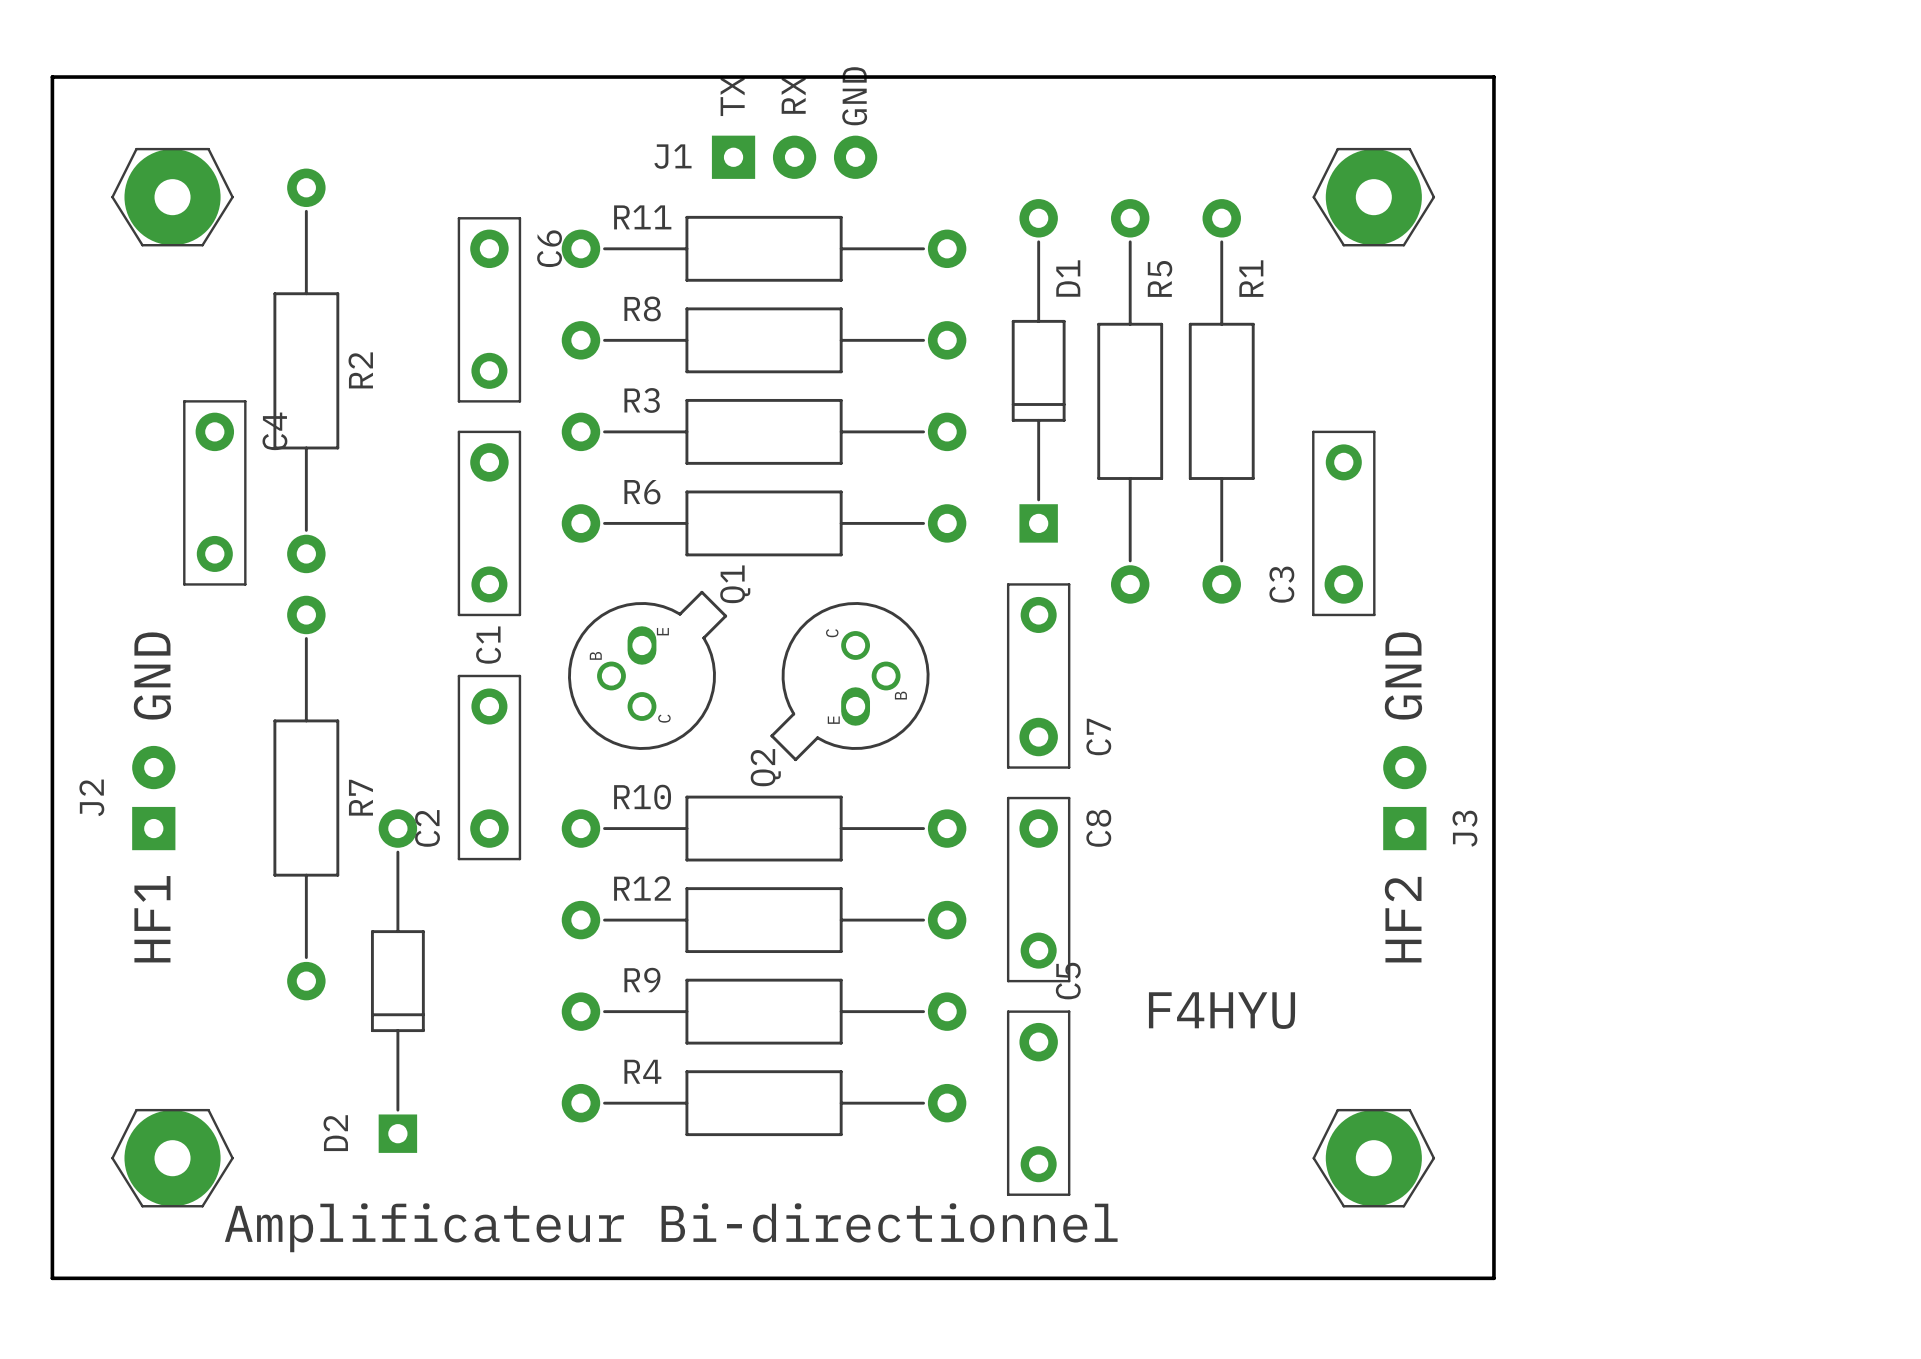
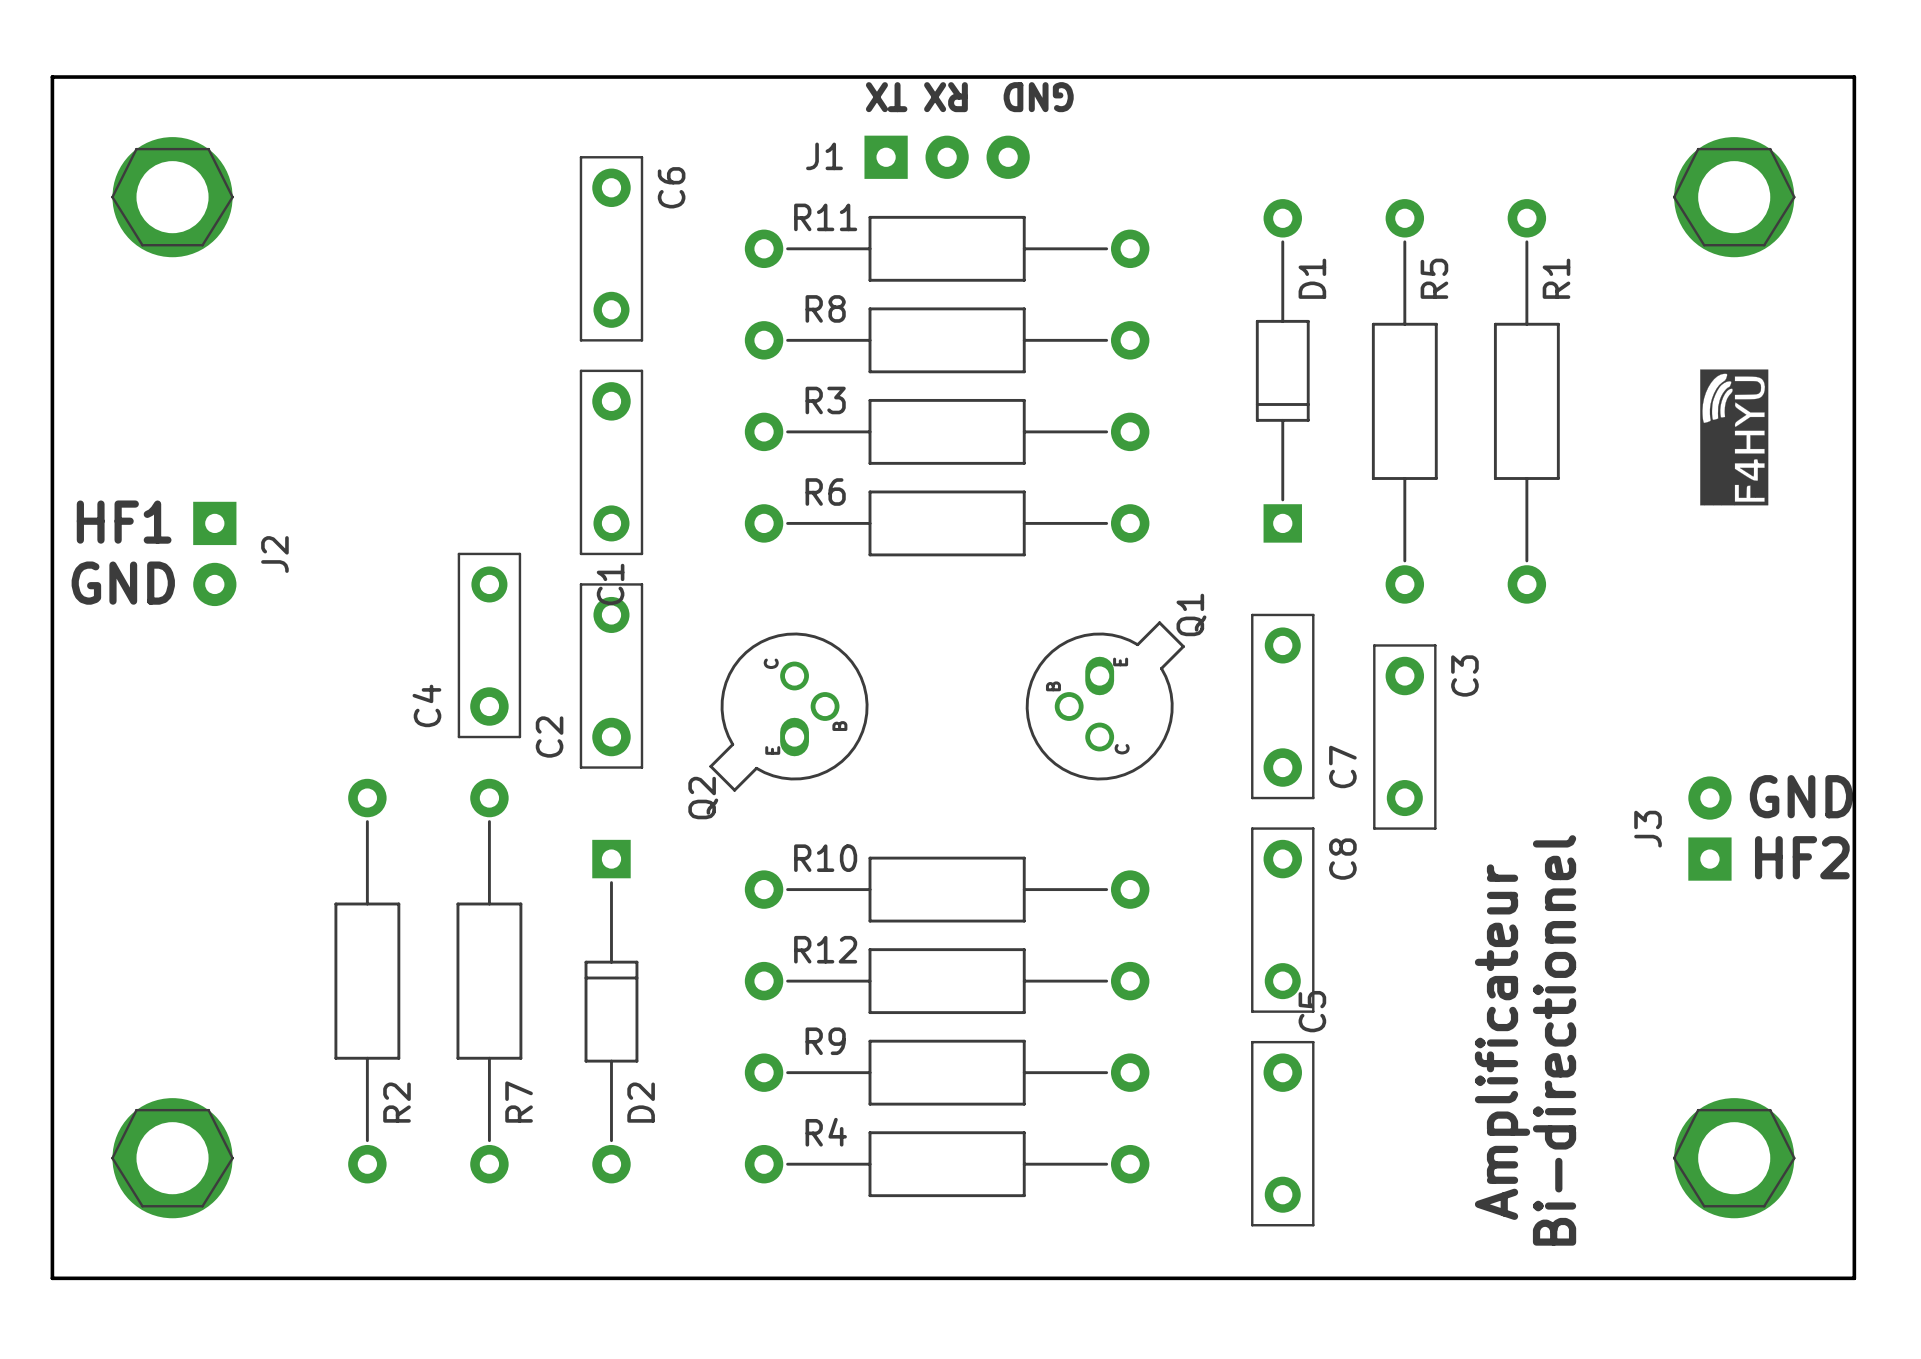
board edge: (1493, 77) (1493, 1278) -> (1493, 77) (1854, 77) (1854, 1278) (1493, 1278)
text rotation: 0° (793, 95) -> 90° counterclockwise (945, 97)
text position: RX (793, 95) -> RX (945, 97)
text rotation: 0° (732, 96) -> 90° counterclockwise (886, 97)
text position: TX (732, 96) -> TX (886, 97)
text rotation: 0° (854, 96) -> 90° counterclockwise (1038, 97)
text position: GND (854, 96) -> GND (1038, 97)
part footprint: [111, 147, 234, 247] -> [111, 137, 234, 258]
J1 position: (794, 157) -> (947, 157)
part: (1373, 197) -> none
part: none -> (1734, 197)
R11 position: (764, 248) -> (947, 248)
C6 position: (489, 309) -> (611, 248)
R8 position: (764, 340) -> (947, 340)
drawing: none -> [1700, 369, 1769, 506]
R2 position: (306, 370) -> (367, 981)
R2 name position: R2 (360, 370) -> R2 (396, 1102)
D1 position: (1038, 370) -> (1282, 370)
R5 position: (1130, 401) -> (1404, 401)
R1 position: (1221, 401) -> (1526, 401)
R3 position: (764, 431) -> (947, 431)
C4 rotation: 0° (214, 492) -> 180° (489, 645)
C4 position: (214, 492) -> (489, 645)
C1 position: (489, 523) -> (611, 462)
R6 position: (764, 523) -> (947, 523)
C3 rotation: 0° (1343, 523) -> 180° (1404, 737)
C3 position: (1343, 523) -> (1404, 737)
Q1 position: (647, 670) -> (1105, 700)
text rotation: 0° (152, 675) -> 90° clockwise (123, 583)
C7 position: (1038, 675) -> (1282, 706)
text: GND (1403, 675) -> none
Q2 position: (849, 681) -> (788, 712)
C2 position: (489, 767) -> (611, 675)
text: none -> GND (1801, 796)
R7 name position: R7 (360, 797) -> R7 (519, 1102)
J2 rotation: 0° (153, 798) -> 180° (214, 553)
J2 position: (153, 798) -> (214, 553)
R7 position: (306, 798) -> (489, 981)
J3 position: (1404, 798) -> (1709, 828)
R10 position: (764, 828) -> (947, 889)
J3 name position: J3 (1464, 828) -> J3 (1648, 829)
C8 position: (1038, 889) -> (1282, 920)
text rotation: 0° (152, 919) -> 90° clockwise (124, 522)
text position: HF1 (152, 919) -> HF1 (124, 522)
text rotation: 0° (1403, 919) -> 90° clockwise (1802, 857)
text position: HF2 (1403, 919) -> HF2 (1802, 857)
R12 position: (764, 920) -> (947, 981)
D2 rotation: 0° (397, 981) -> 180° (611, 1011)
D2 position: (397, 981) -> (611, 1011)
text: F4HYU (1222, 1010) -> none
R9 position: (764, 1011) -> (947, 1072)
text: none -> Bi-directionnel (1554, 1040)
text: none -> Amplificateur (1502, 1042)
R4 position: (764, 1103) -> (947, 1164)
C5 position: (1038, 1103) -> (1282, 1133)
part footprint: [111, 1108, 234, 1208] -> [111, 1098, 234, 1219]
D2 name position: D2 (335, 1133) -> D2 (641, 1102)
part: (1373, 1158) -> none
part: none -> (1734, 1158)
text: Amplificateur Bi-directionnel (671, 1227) -> none

